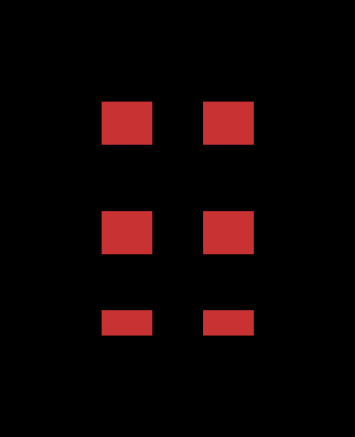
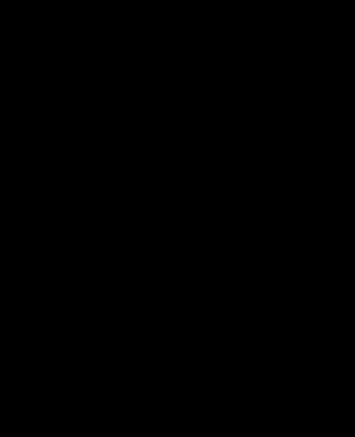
part: (177, 123) -> none
part: (177, 232) -> none
part: (177, 322) -> none

